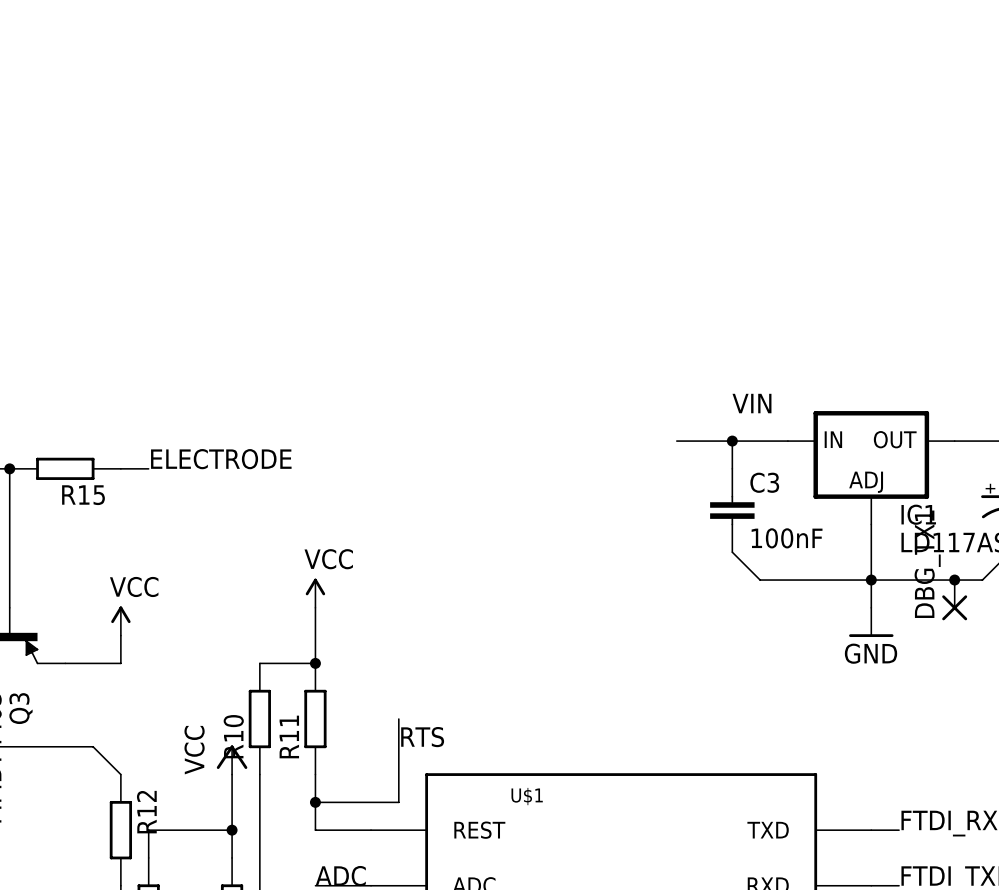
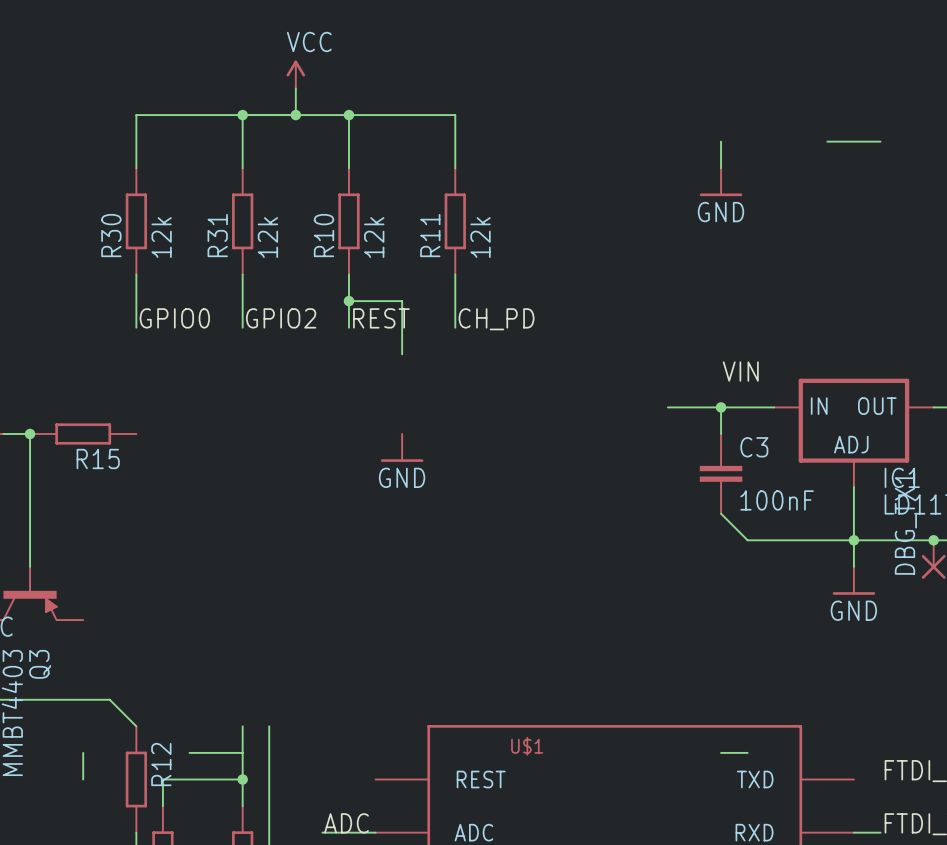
power symbol: none -> VCC (295, 74)
wire: none -> (295, 88) (295, 115)
wire: none -> (242, 115) (242, 168)
junction: none -> (242, 115)
junction: none -> (295, 115)
wire: none -> (348, 115) (348, 168)
junction: none -> (348, 115)
wire: none -> (721, 141) (721, 168)
wire: none -> (827, 141) (880, 141)
wire: none -> (136, 168) (136, 115) (455, 115) (455, 168)
power symbol: none -> GND (721, 182)
R30: none -> 12k (136, 221)
R31: none -> 12k (242, 221)
R10 value: none -> 12k (374, 237)
R11 value: none -> 12k (480, 237)
wire: none -> (136, 274) (136, 327)
wire: none -> (242, 274) (242, 327)
wire: none -> (348, 274) (348, 327)
wire: none -> (455, 274) (455, 327)
wire: none -> (348, 301) (402, 301) (402, 354)
junction: none -> (348, 301)
label: none -> GPIO0 (174, 318)
label: none -> GPIO2 (281, 318)
label: none -> REST (381, 318)
label: none -> CH_PD (496, 319)
label: ELECTRODE (221, 459) -> none
wire: (120, 468) (148, 468) -> none
power symbol: none -> GND (402, 447)
power symbol: VCC (315, 593) -> none
wire: (315, 607) (315, 663) (259, 663) -> none
power symbol: VCC (120, 621) -> none
wire: (120, 635) (120, 663) (65, 663) -> none
junction: (315, 663) -> none
R10 position: (259, 718) -> (348, 221)
R11 position: (315, 718) -> (455, 221)
wire: (398, 718) (398, 802) (315, 802) -> none
label: RTS (422, 737) -> none
power symbol: VCC (232, 759) -> none
wire: (315, 774) (315, 830) (371, 830) -> none
wire: none -> (83, 752) (83, 779)
wire: none -> (189, 752) (242, 752)
junction: (315, 802) -> none
wire: (871, 830) (899, 830) -> (721, 752) (747, 752)

